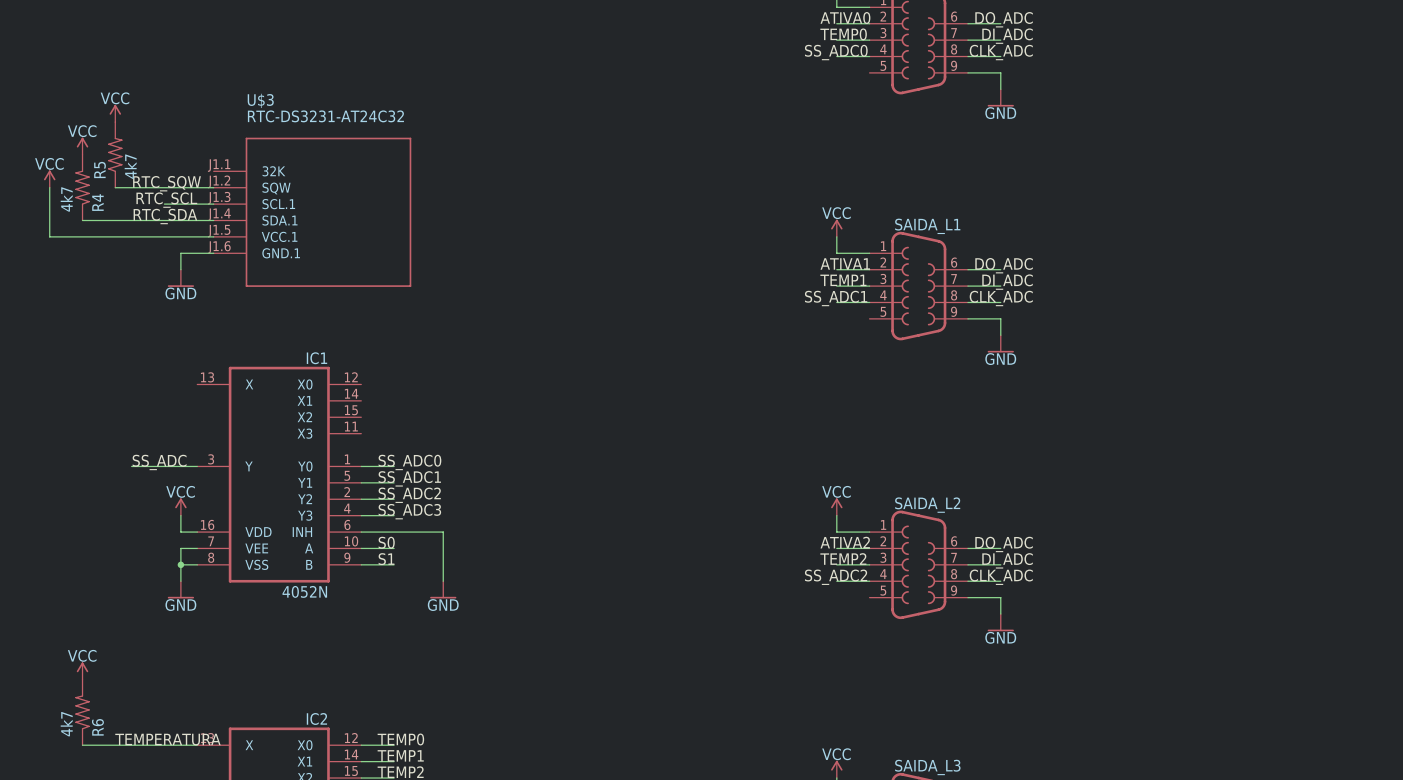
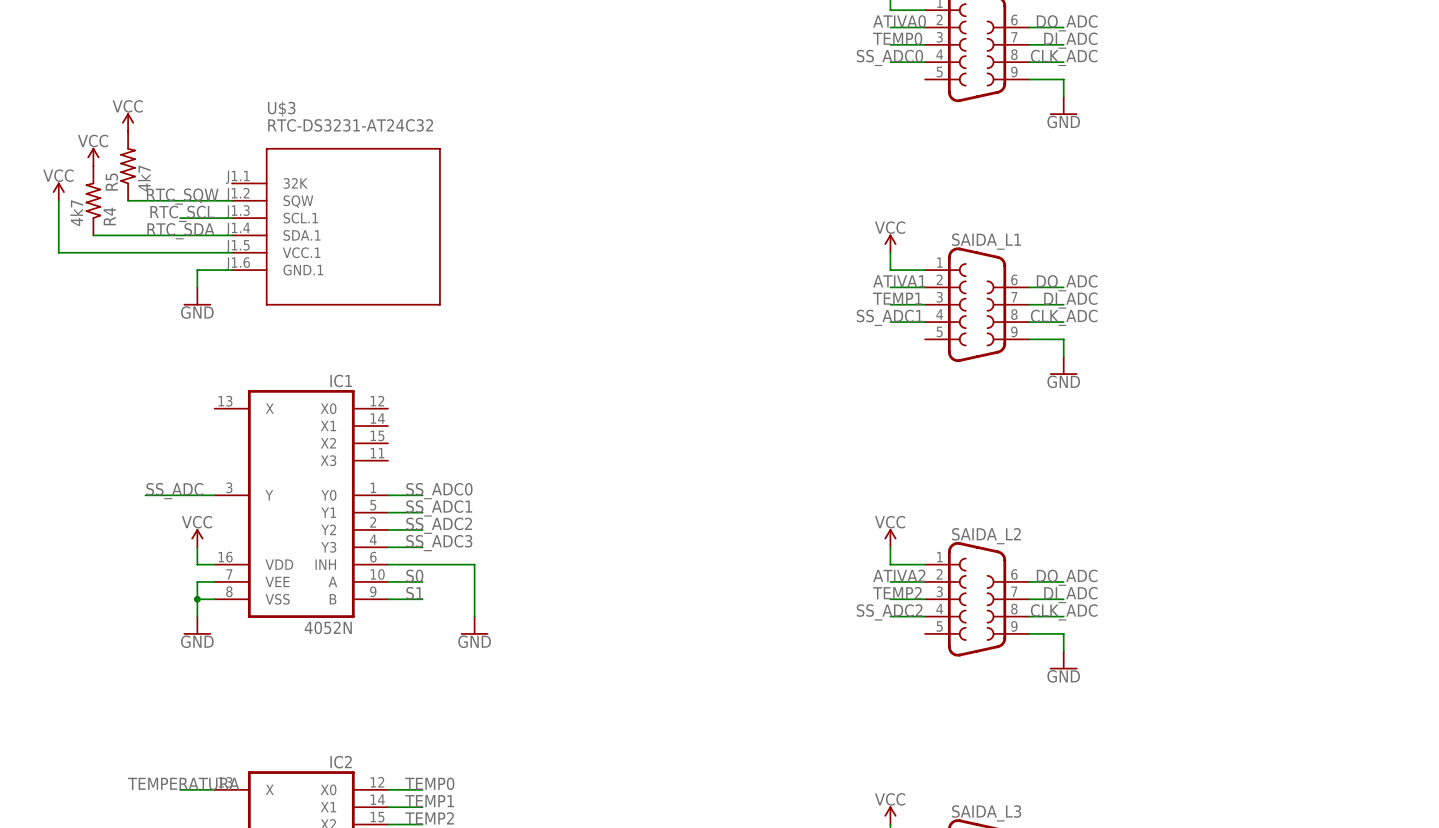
power symbol: VCC (82, 671) -> none
R6: 4k7 (82, 712) -> none
wire: (82, 745) (164, 745) -> none

